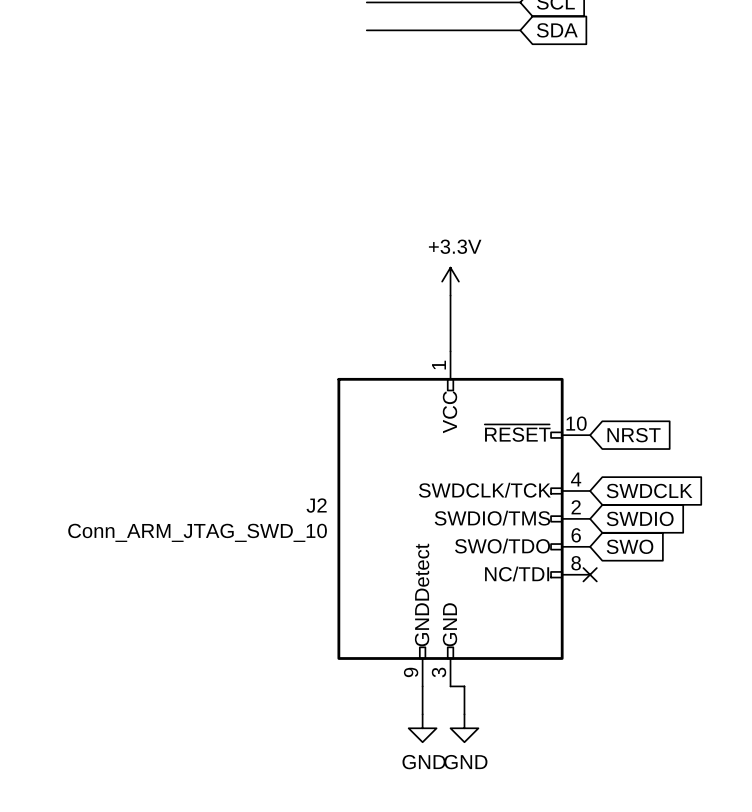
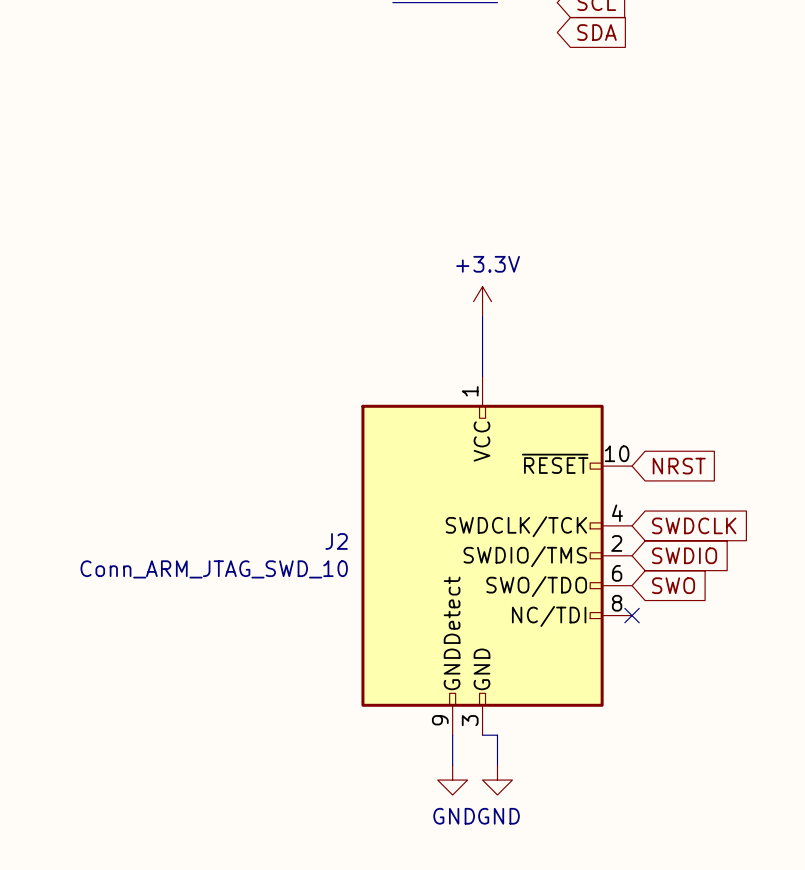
wire: (464, 2) (520, 2) -> none
wire: (366, 30) (520, 30) -> none

